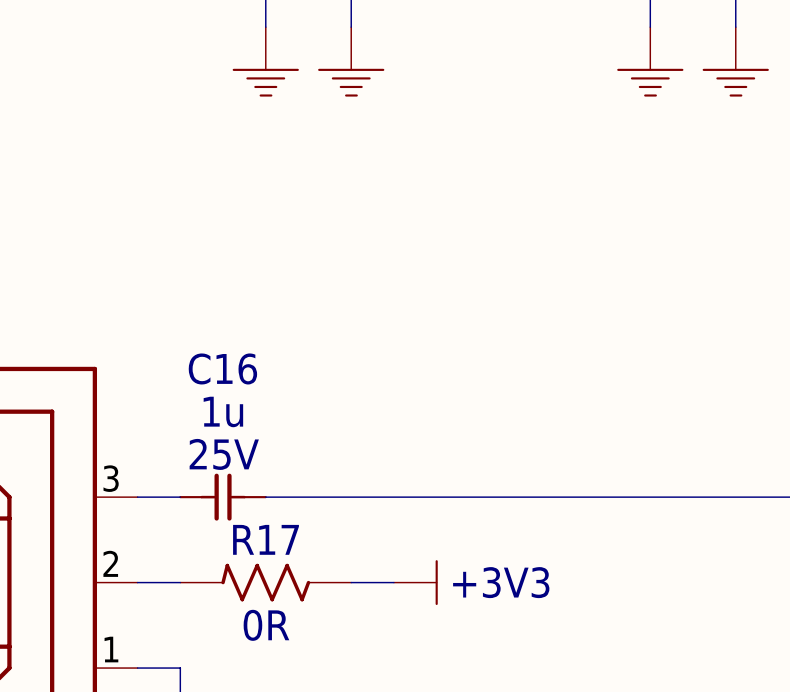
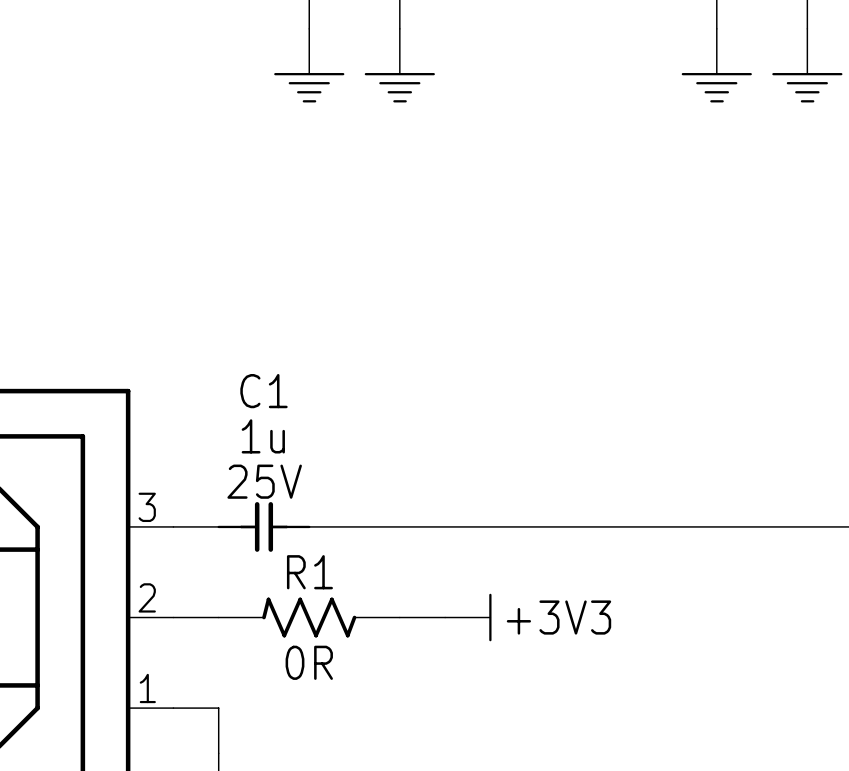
C16 name: C16 (222, 368) -> C1 (263, 391)
R17 name: R17 (266, 539) -> R1 (309, 572)

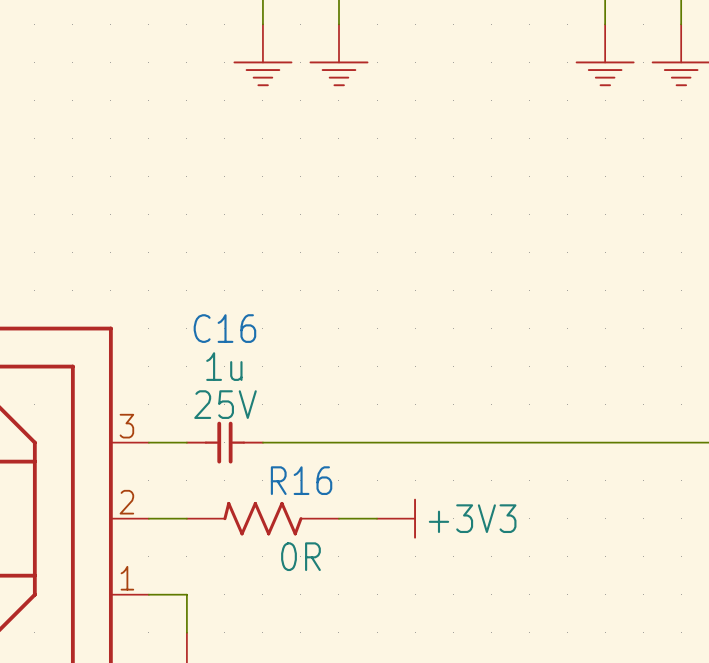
C1 name: C1 (263, 391) -> C16 (224, 328)
R1 name: R1 (309, 572) -> R16 (301, 480)
R1 value position: 0R (309, 662) -> 0R (300, 556)

